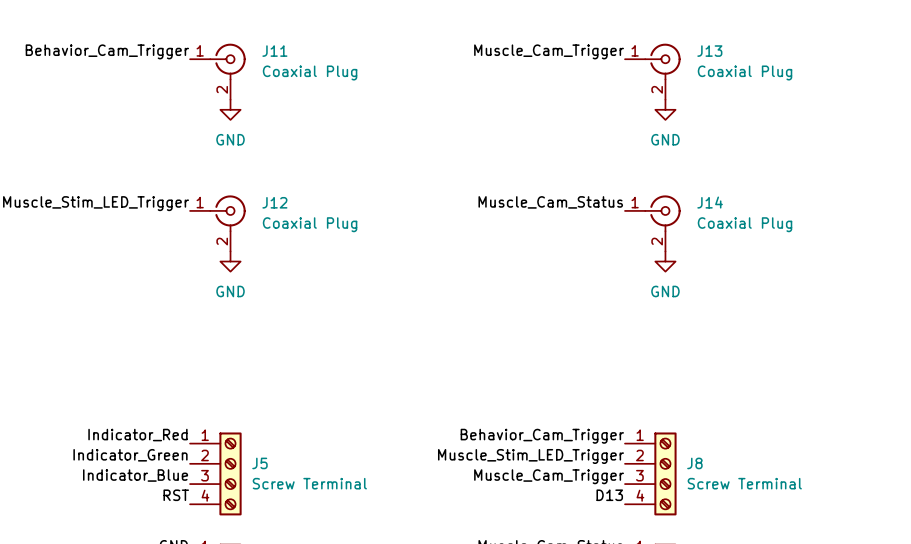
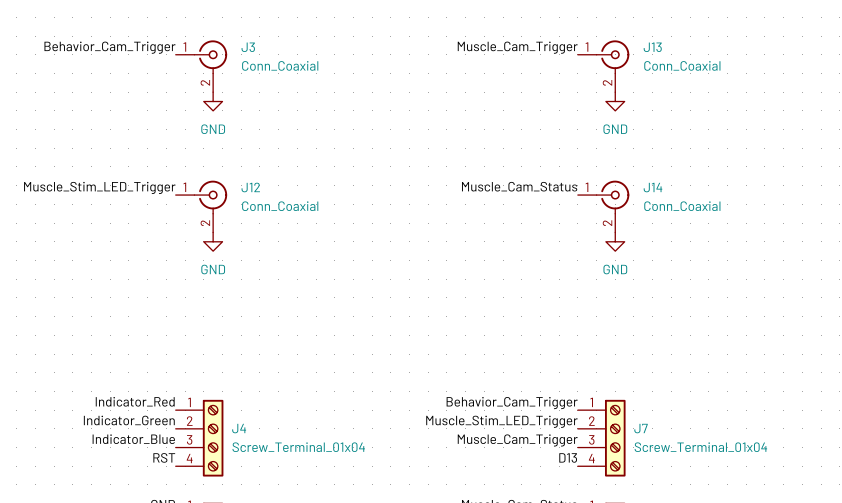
J11 name: J11 (274, 51) -> J3 (248, 47)
J11 value: Coaxial Plug (310, 72) -> Conn_Coaxial (280, 65)
J13 value: Coaxial Plug (745, 72) -> Conn_Coaxial (682, 65)
J12 value: Coaxial Plug (310, 224) -> Conn_Coaxial (280, 206)
J14 value: Coaxial Plug (745, 224) -> Conn_Coaxial (682, 206)
J5 name: J5 (259, 463) -> J4 (239, 428)
J8 name: J8 (694, 463) -> J7 (641, 428)
J5 value: Screw Terminal (309, 483) -> Screw_Terminal_01x04 (298, 447)
J8 value: Screw Terminal (744, 483) -> Screw_Terminal_01x04 (700, 447)

